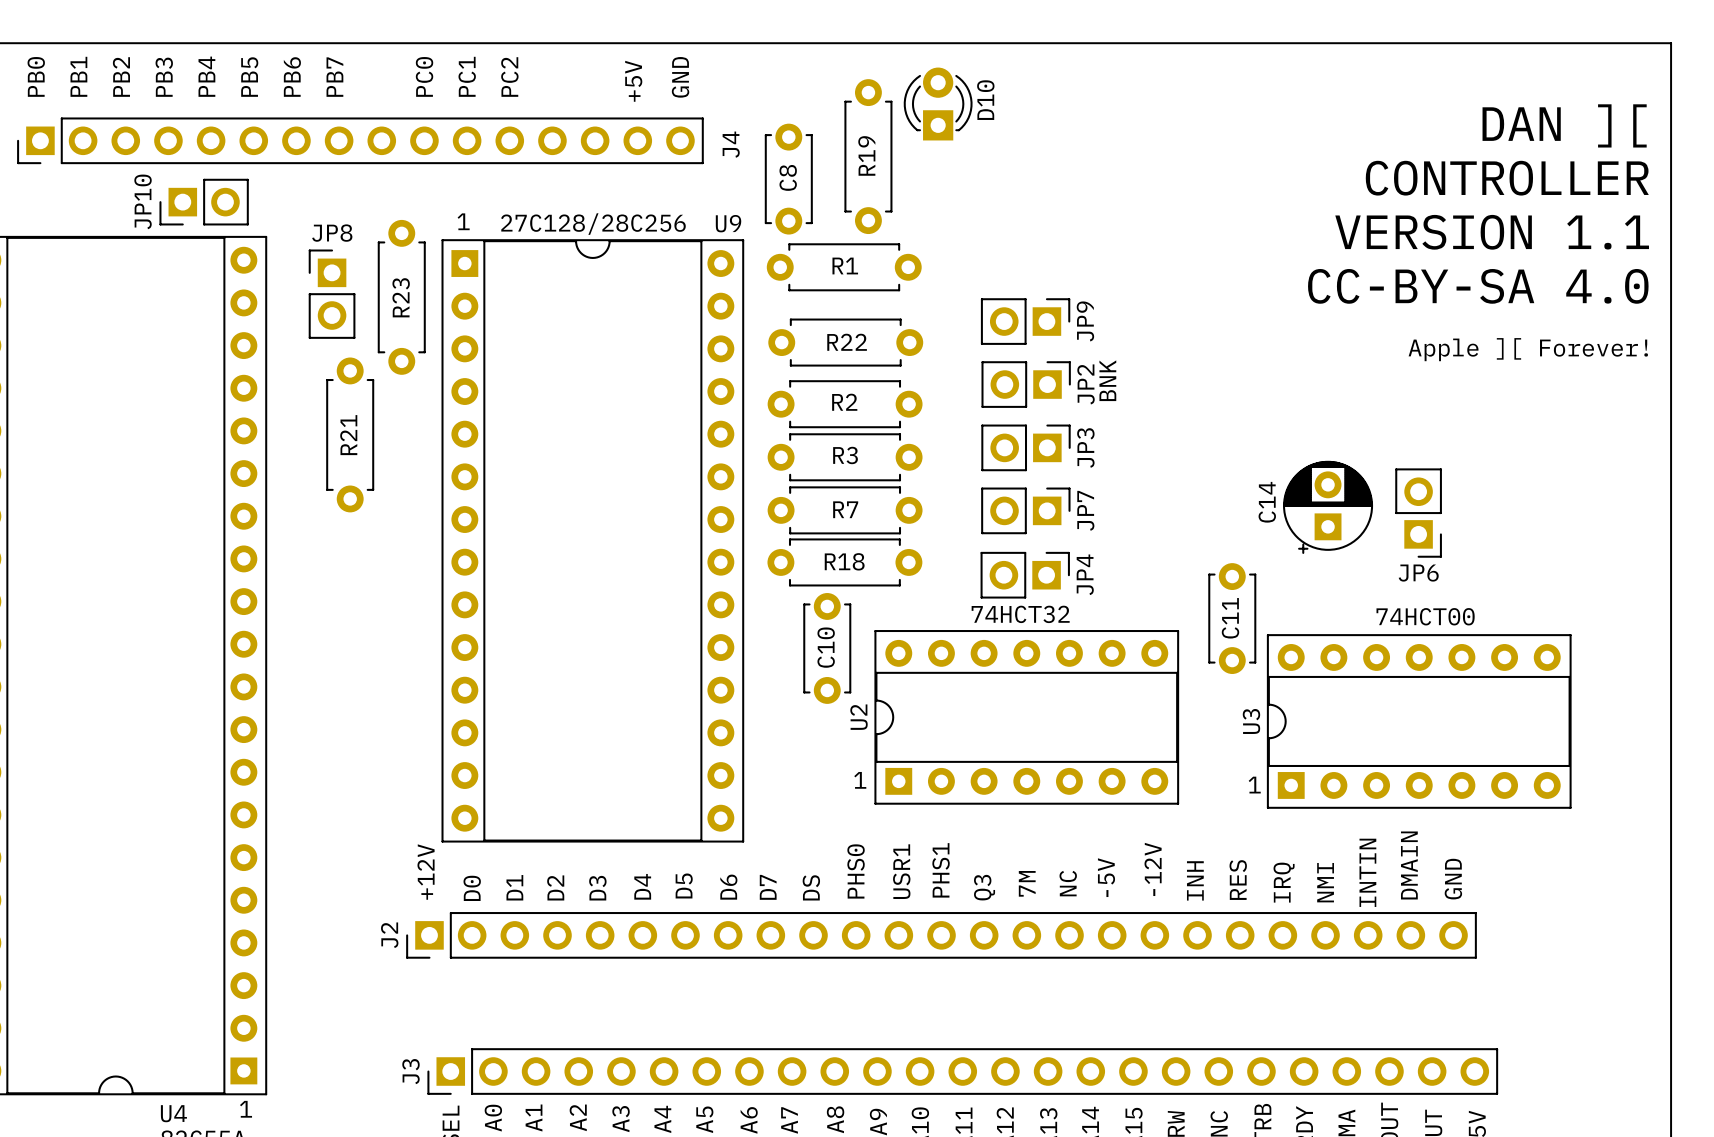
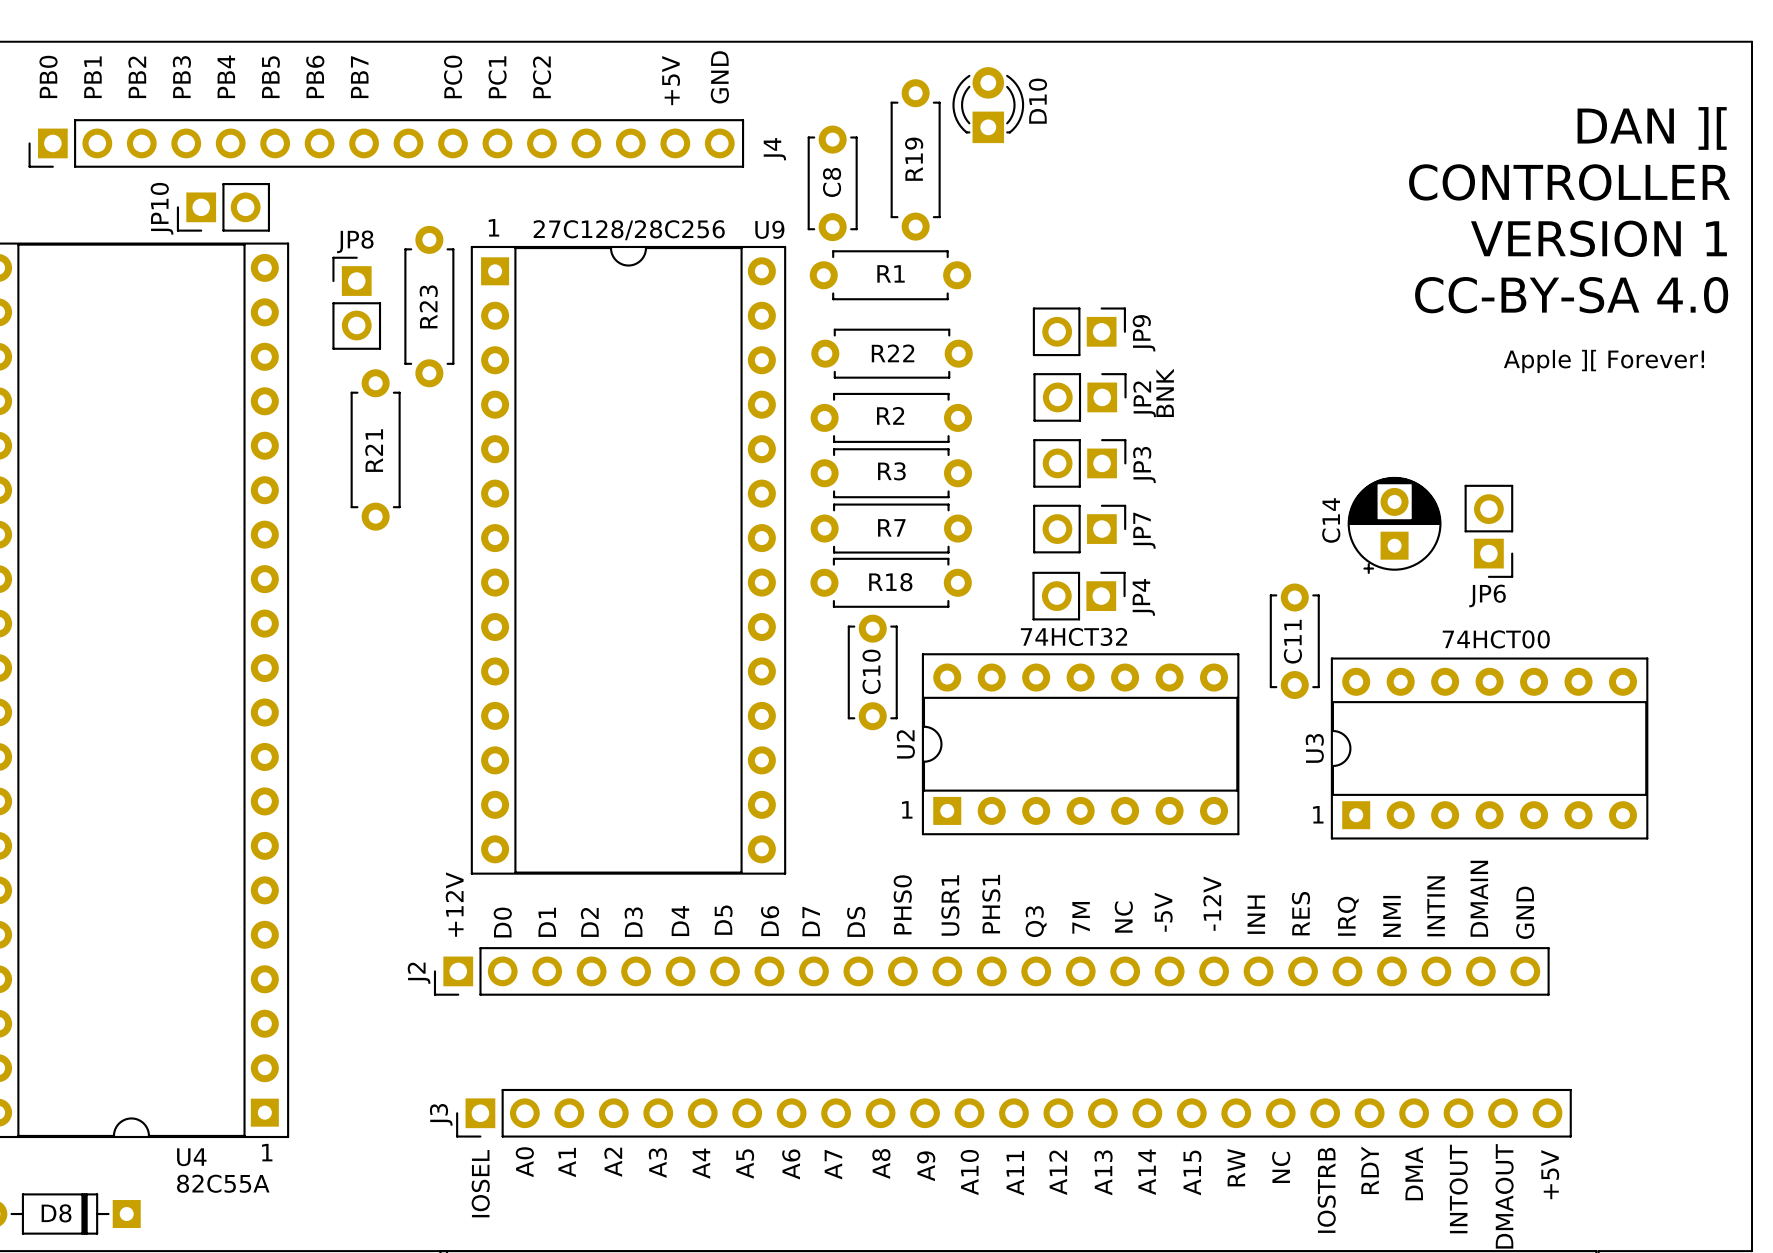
text: VERSION 1.1 (1492, 232) -> VERSION 1 (1598, 238)

